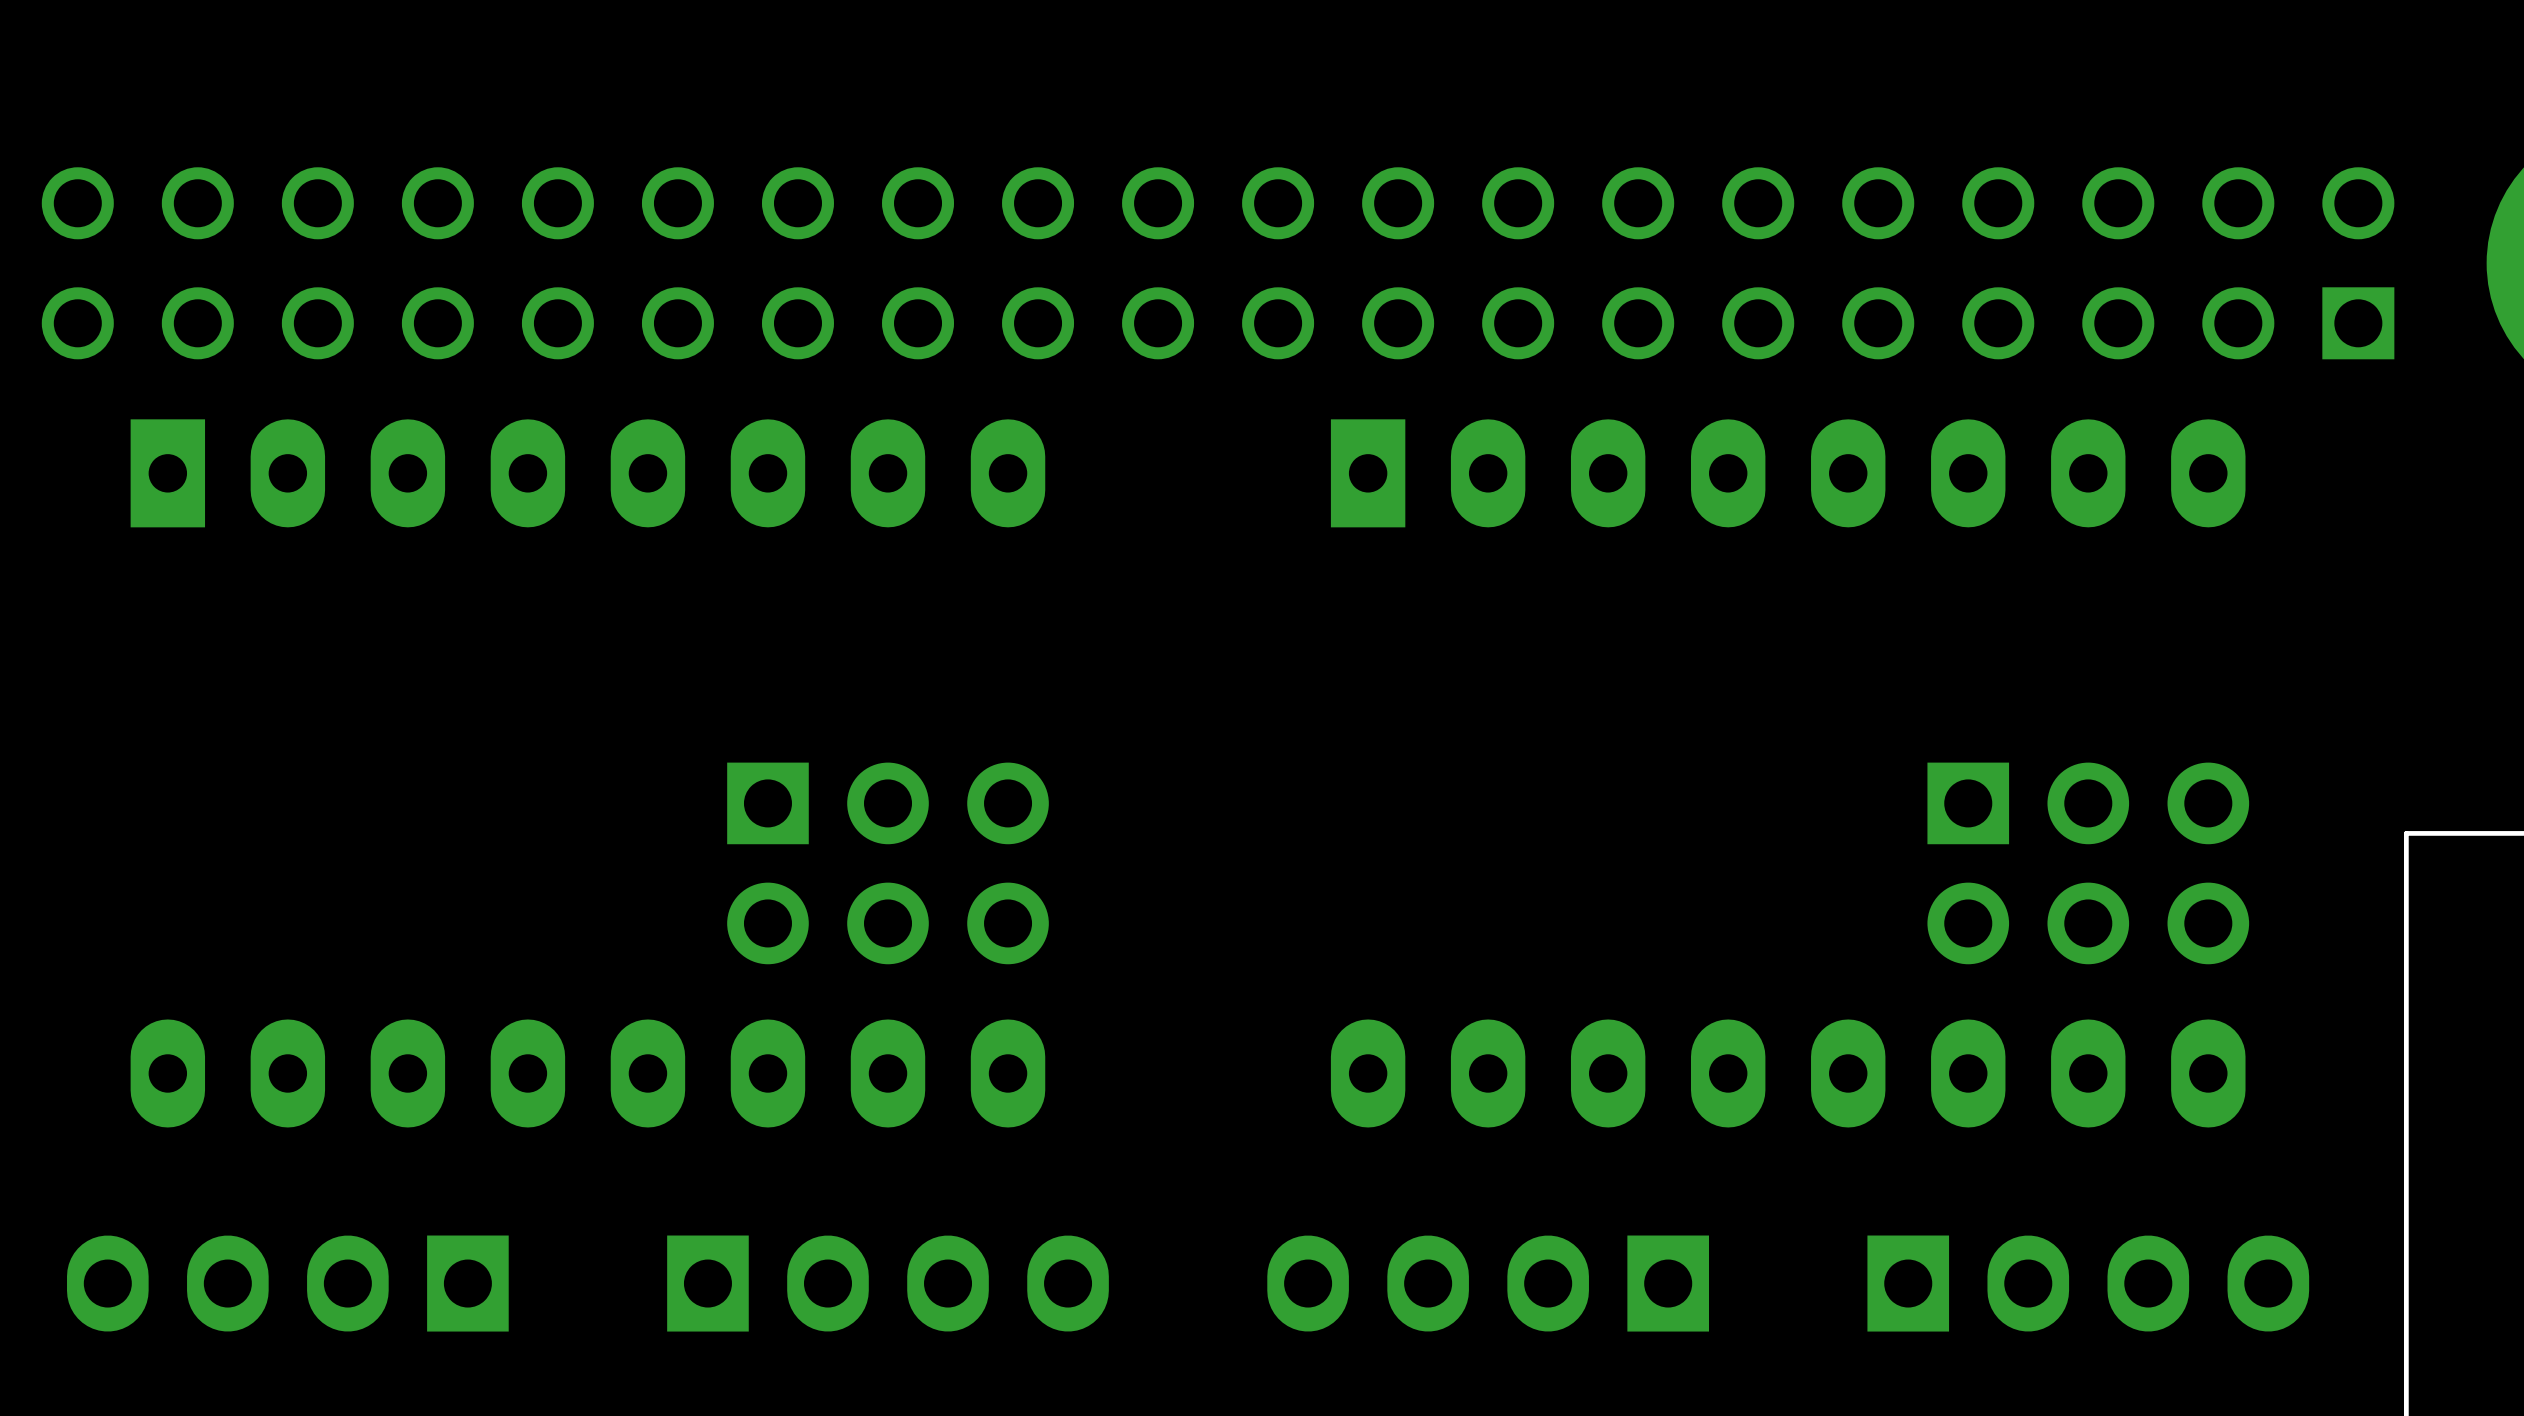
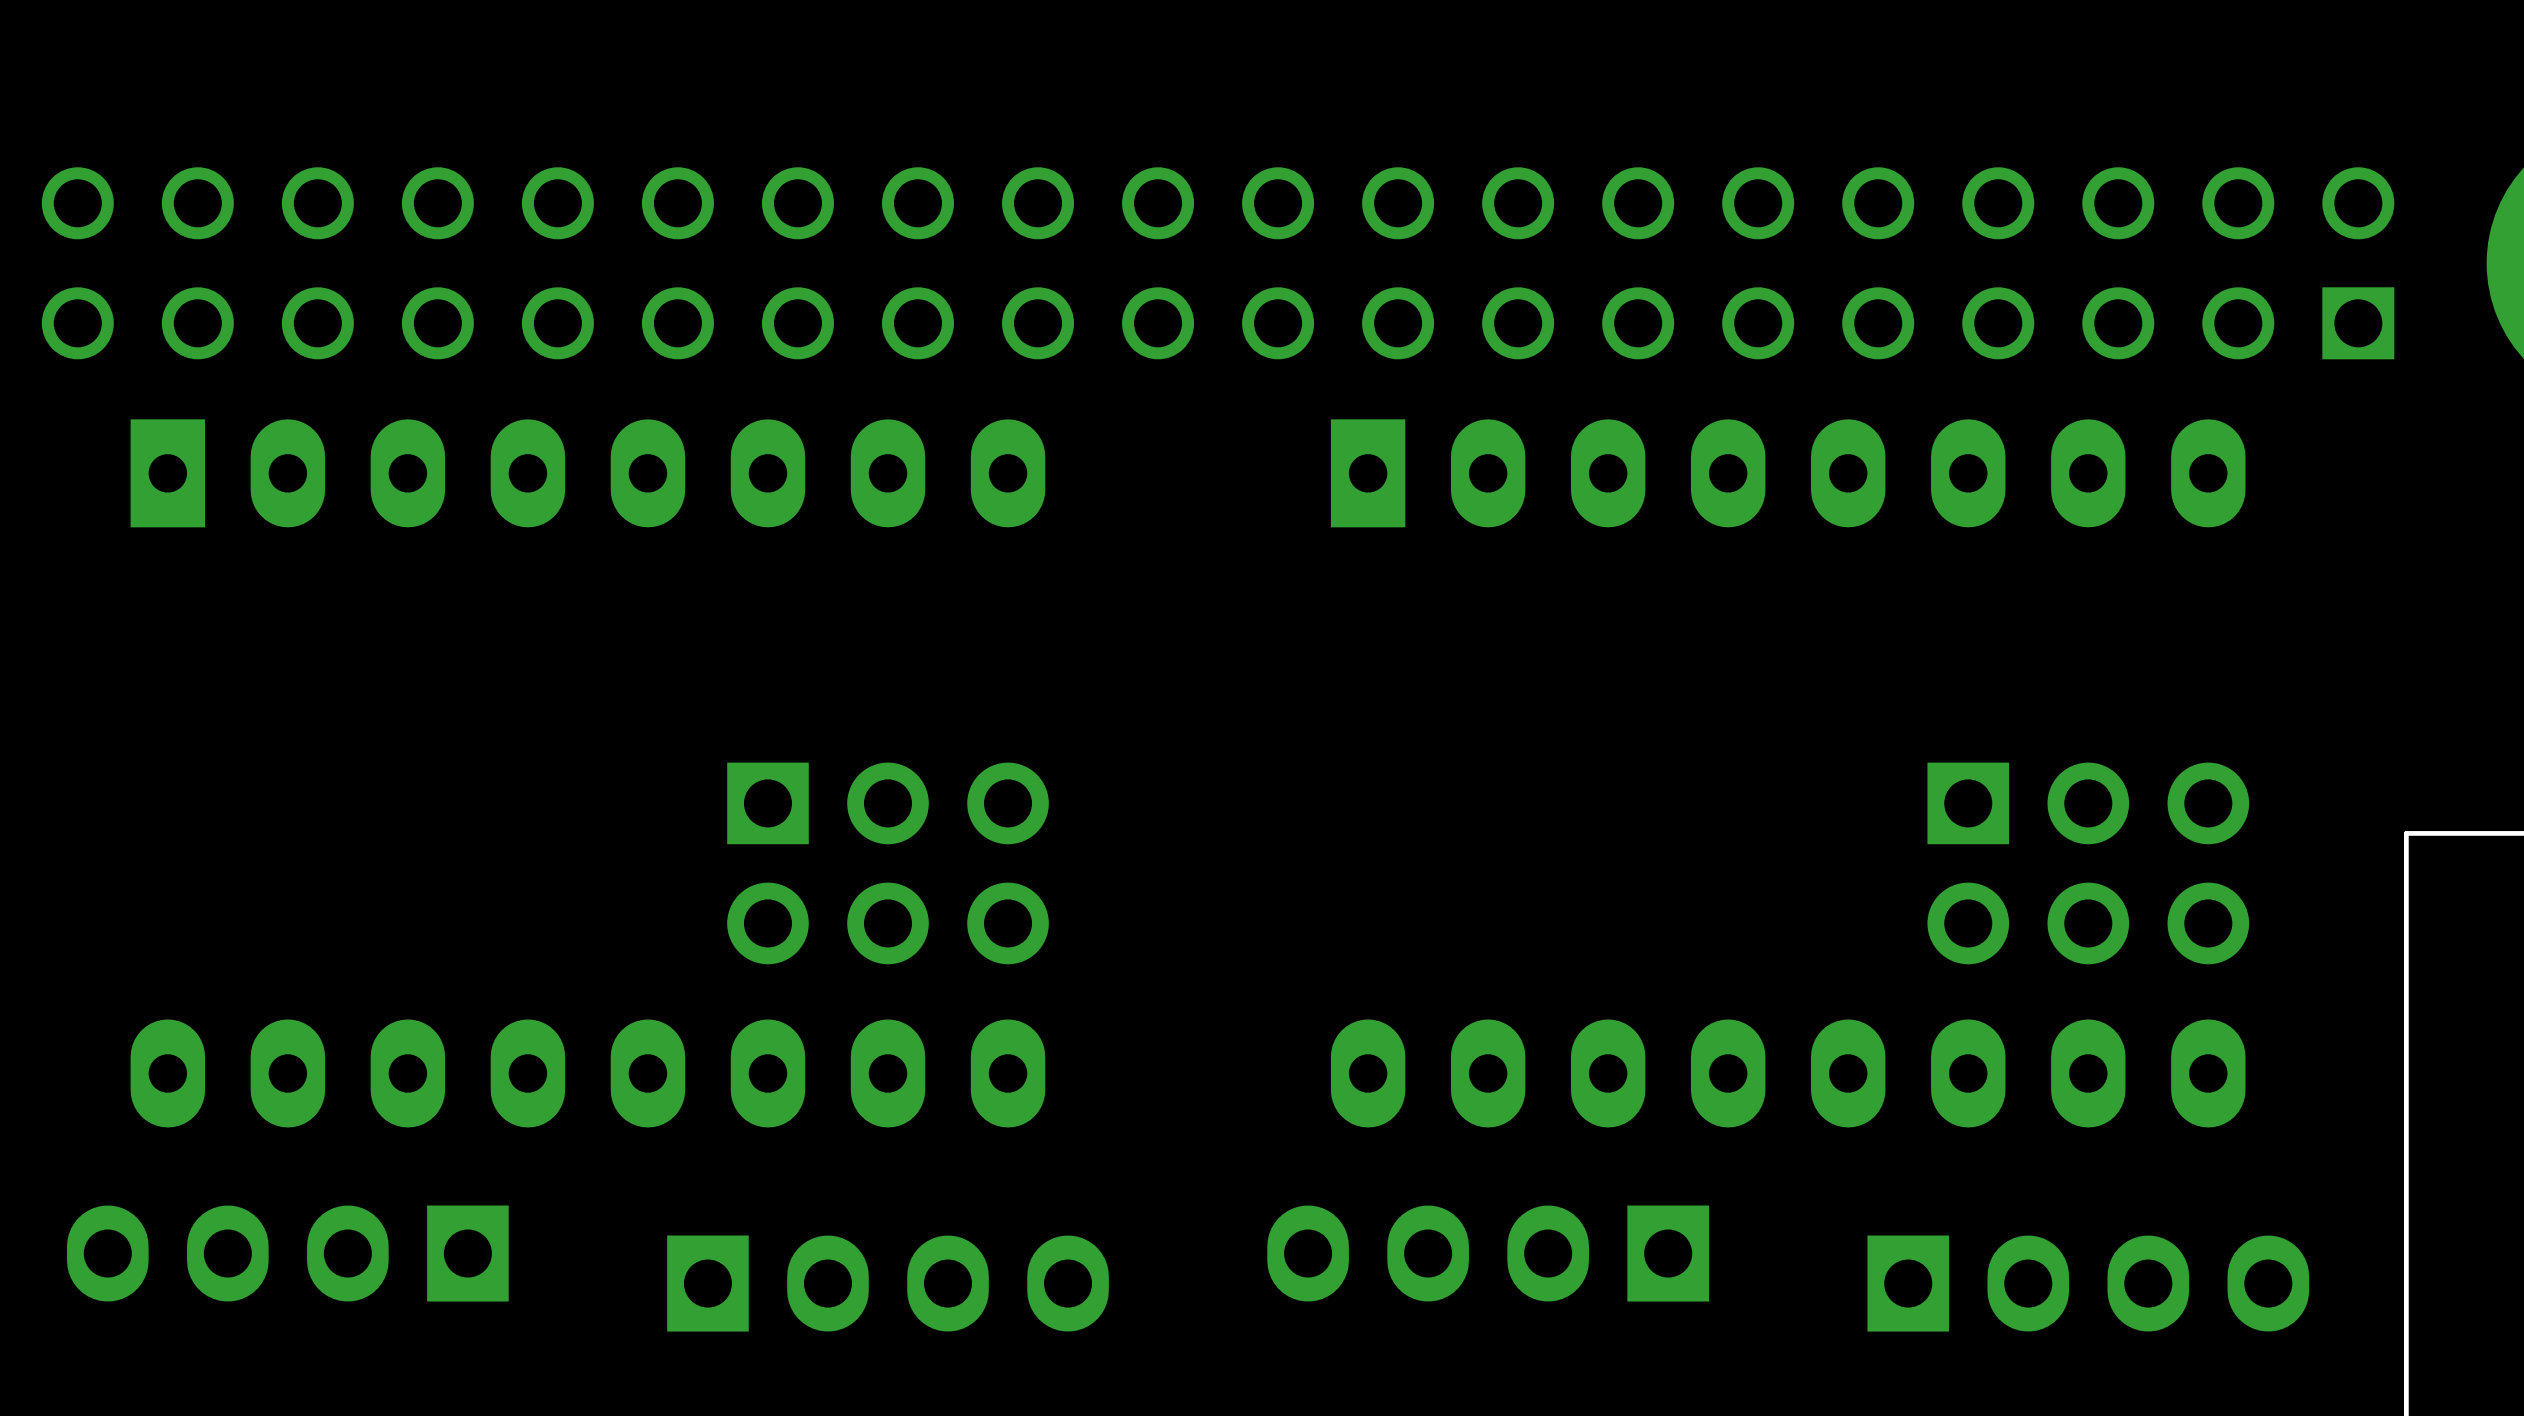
part position: (287, 1283) -> (287, 1253)
part position: (1488, 1283) -> (1488, 1253)

